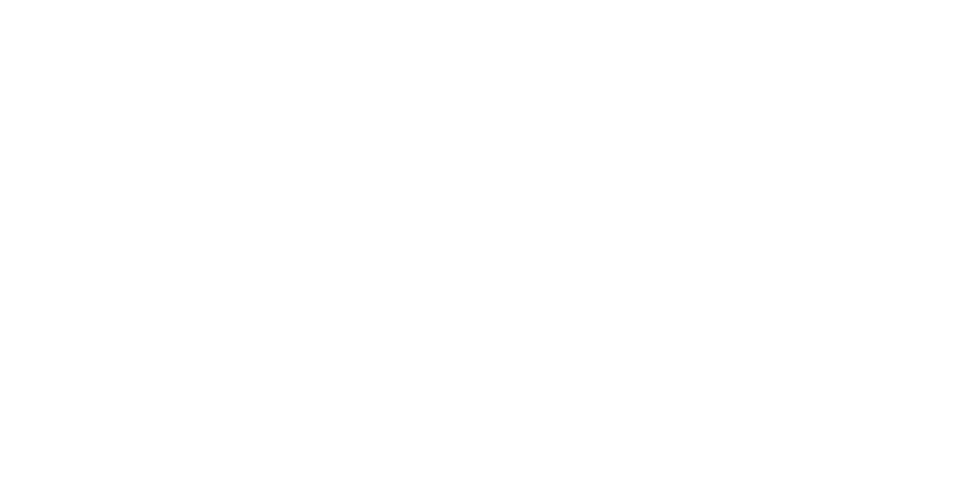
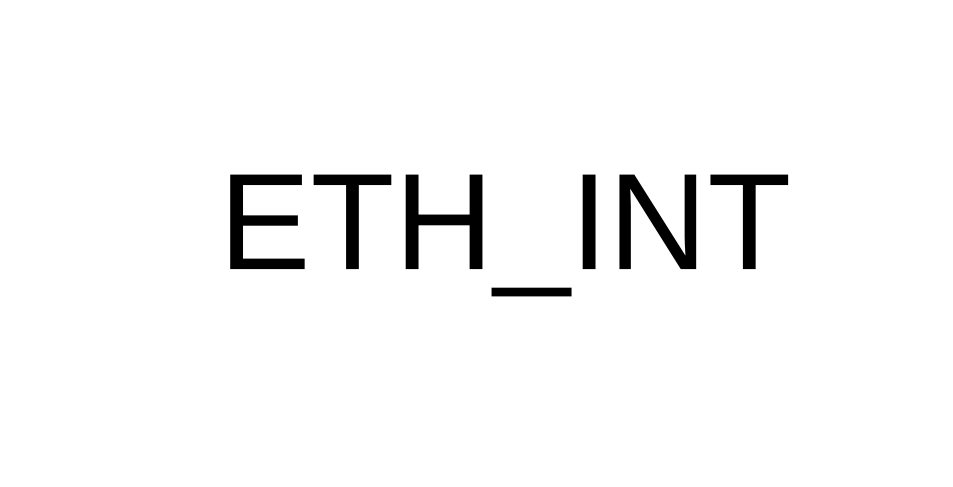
label: none -> ETH_INT (509, 235)

